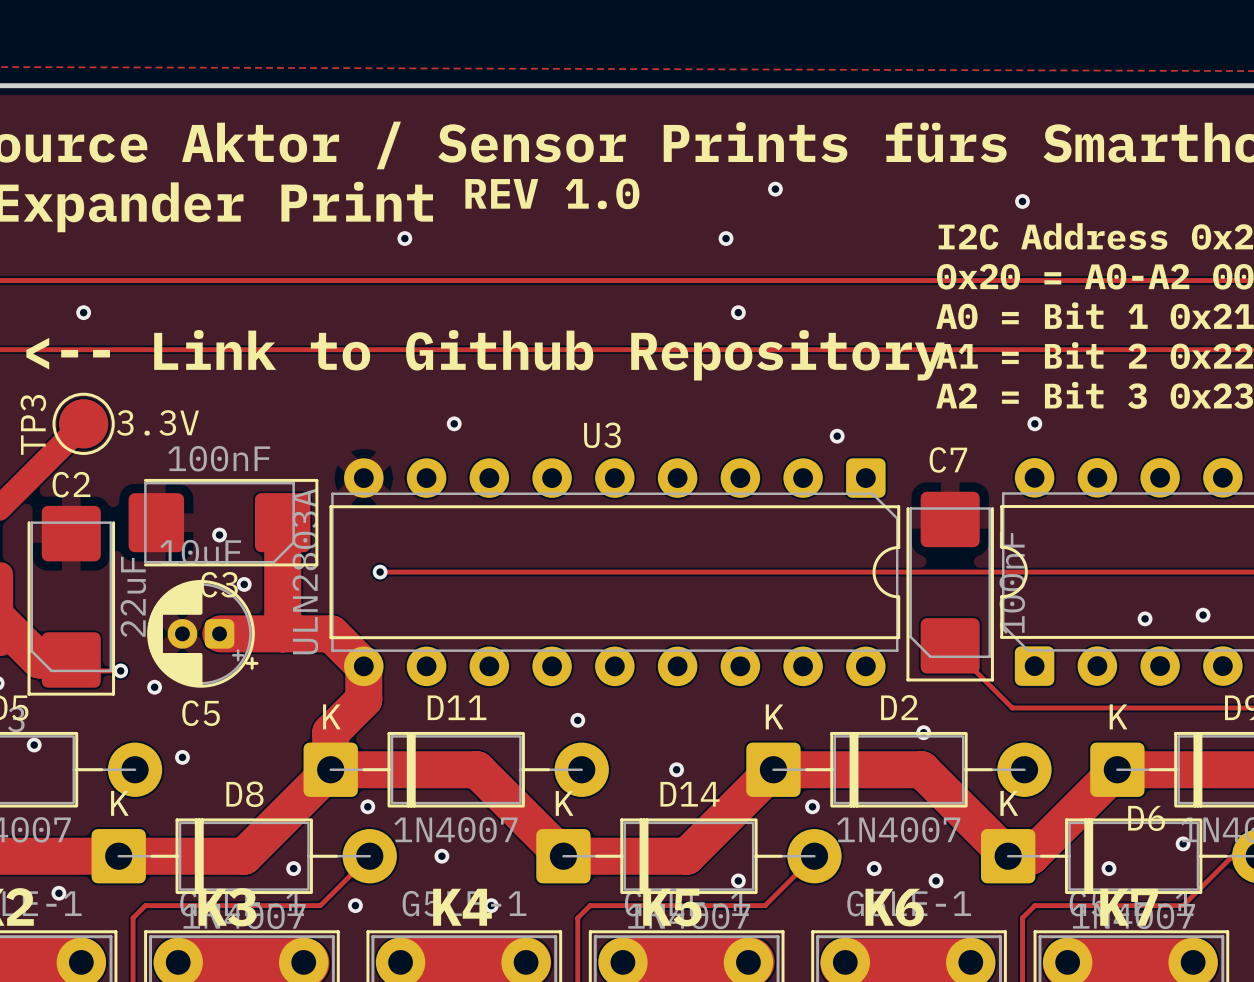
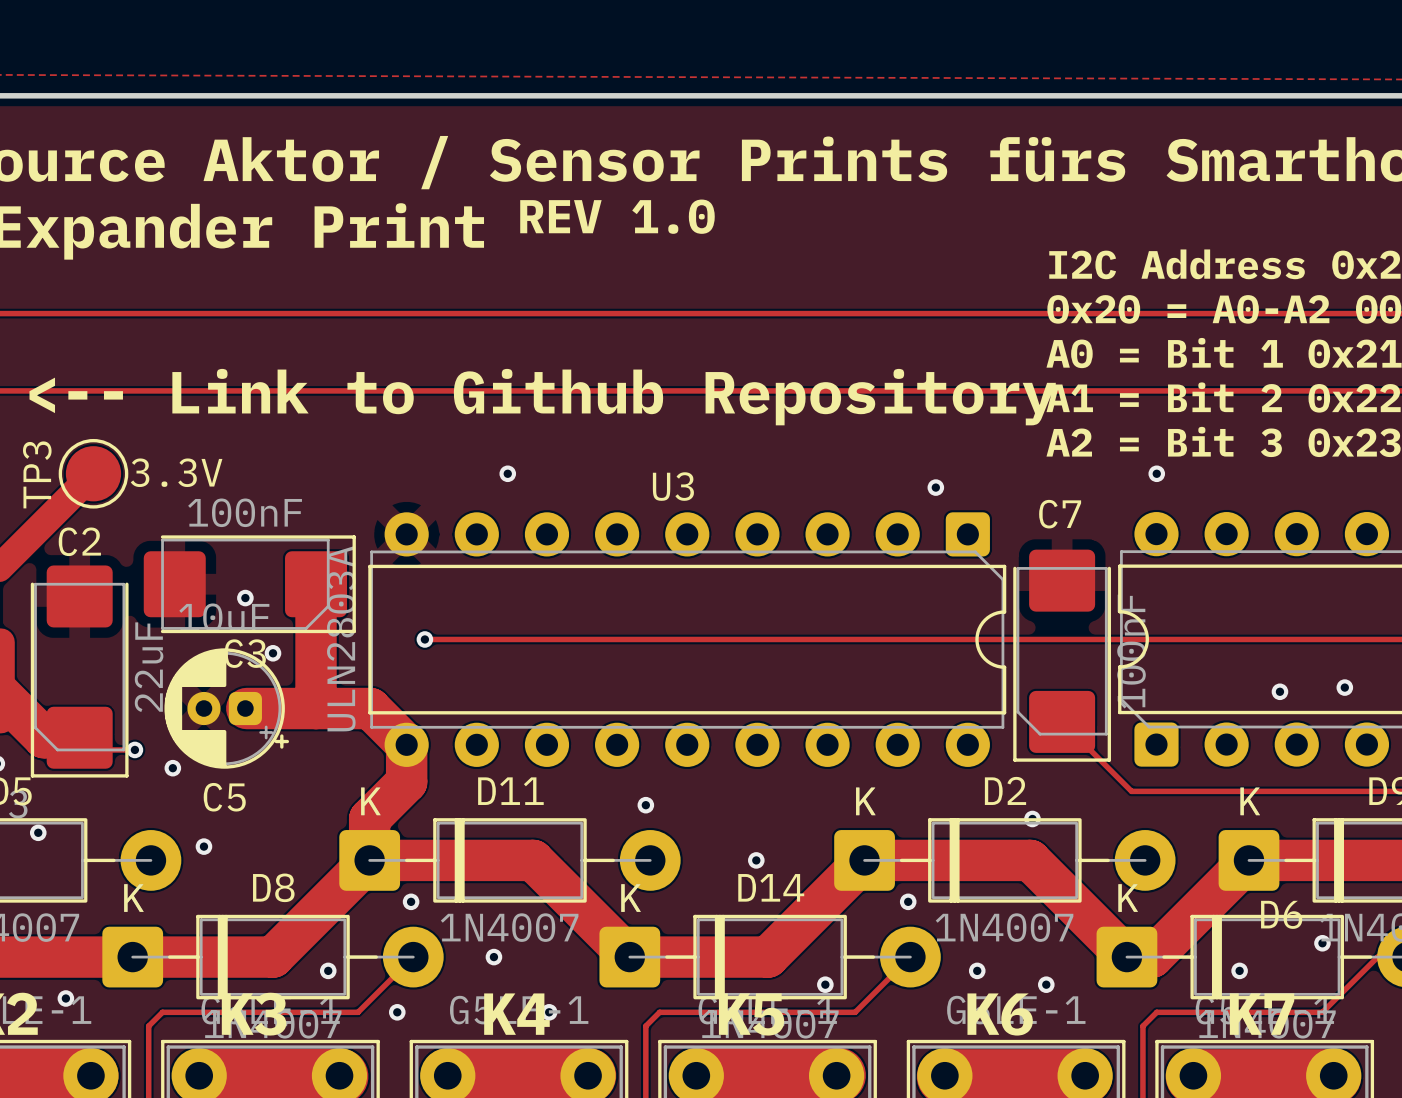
via: (775, 189) -> none
via: (1022, 201) -> none
via: (404, 238) -> none
via: (726, 238) -> none
via: (83, 312) -> none
via: (738, 312) -> none

